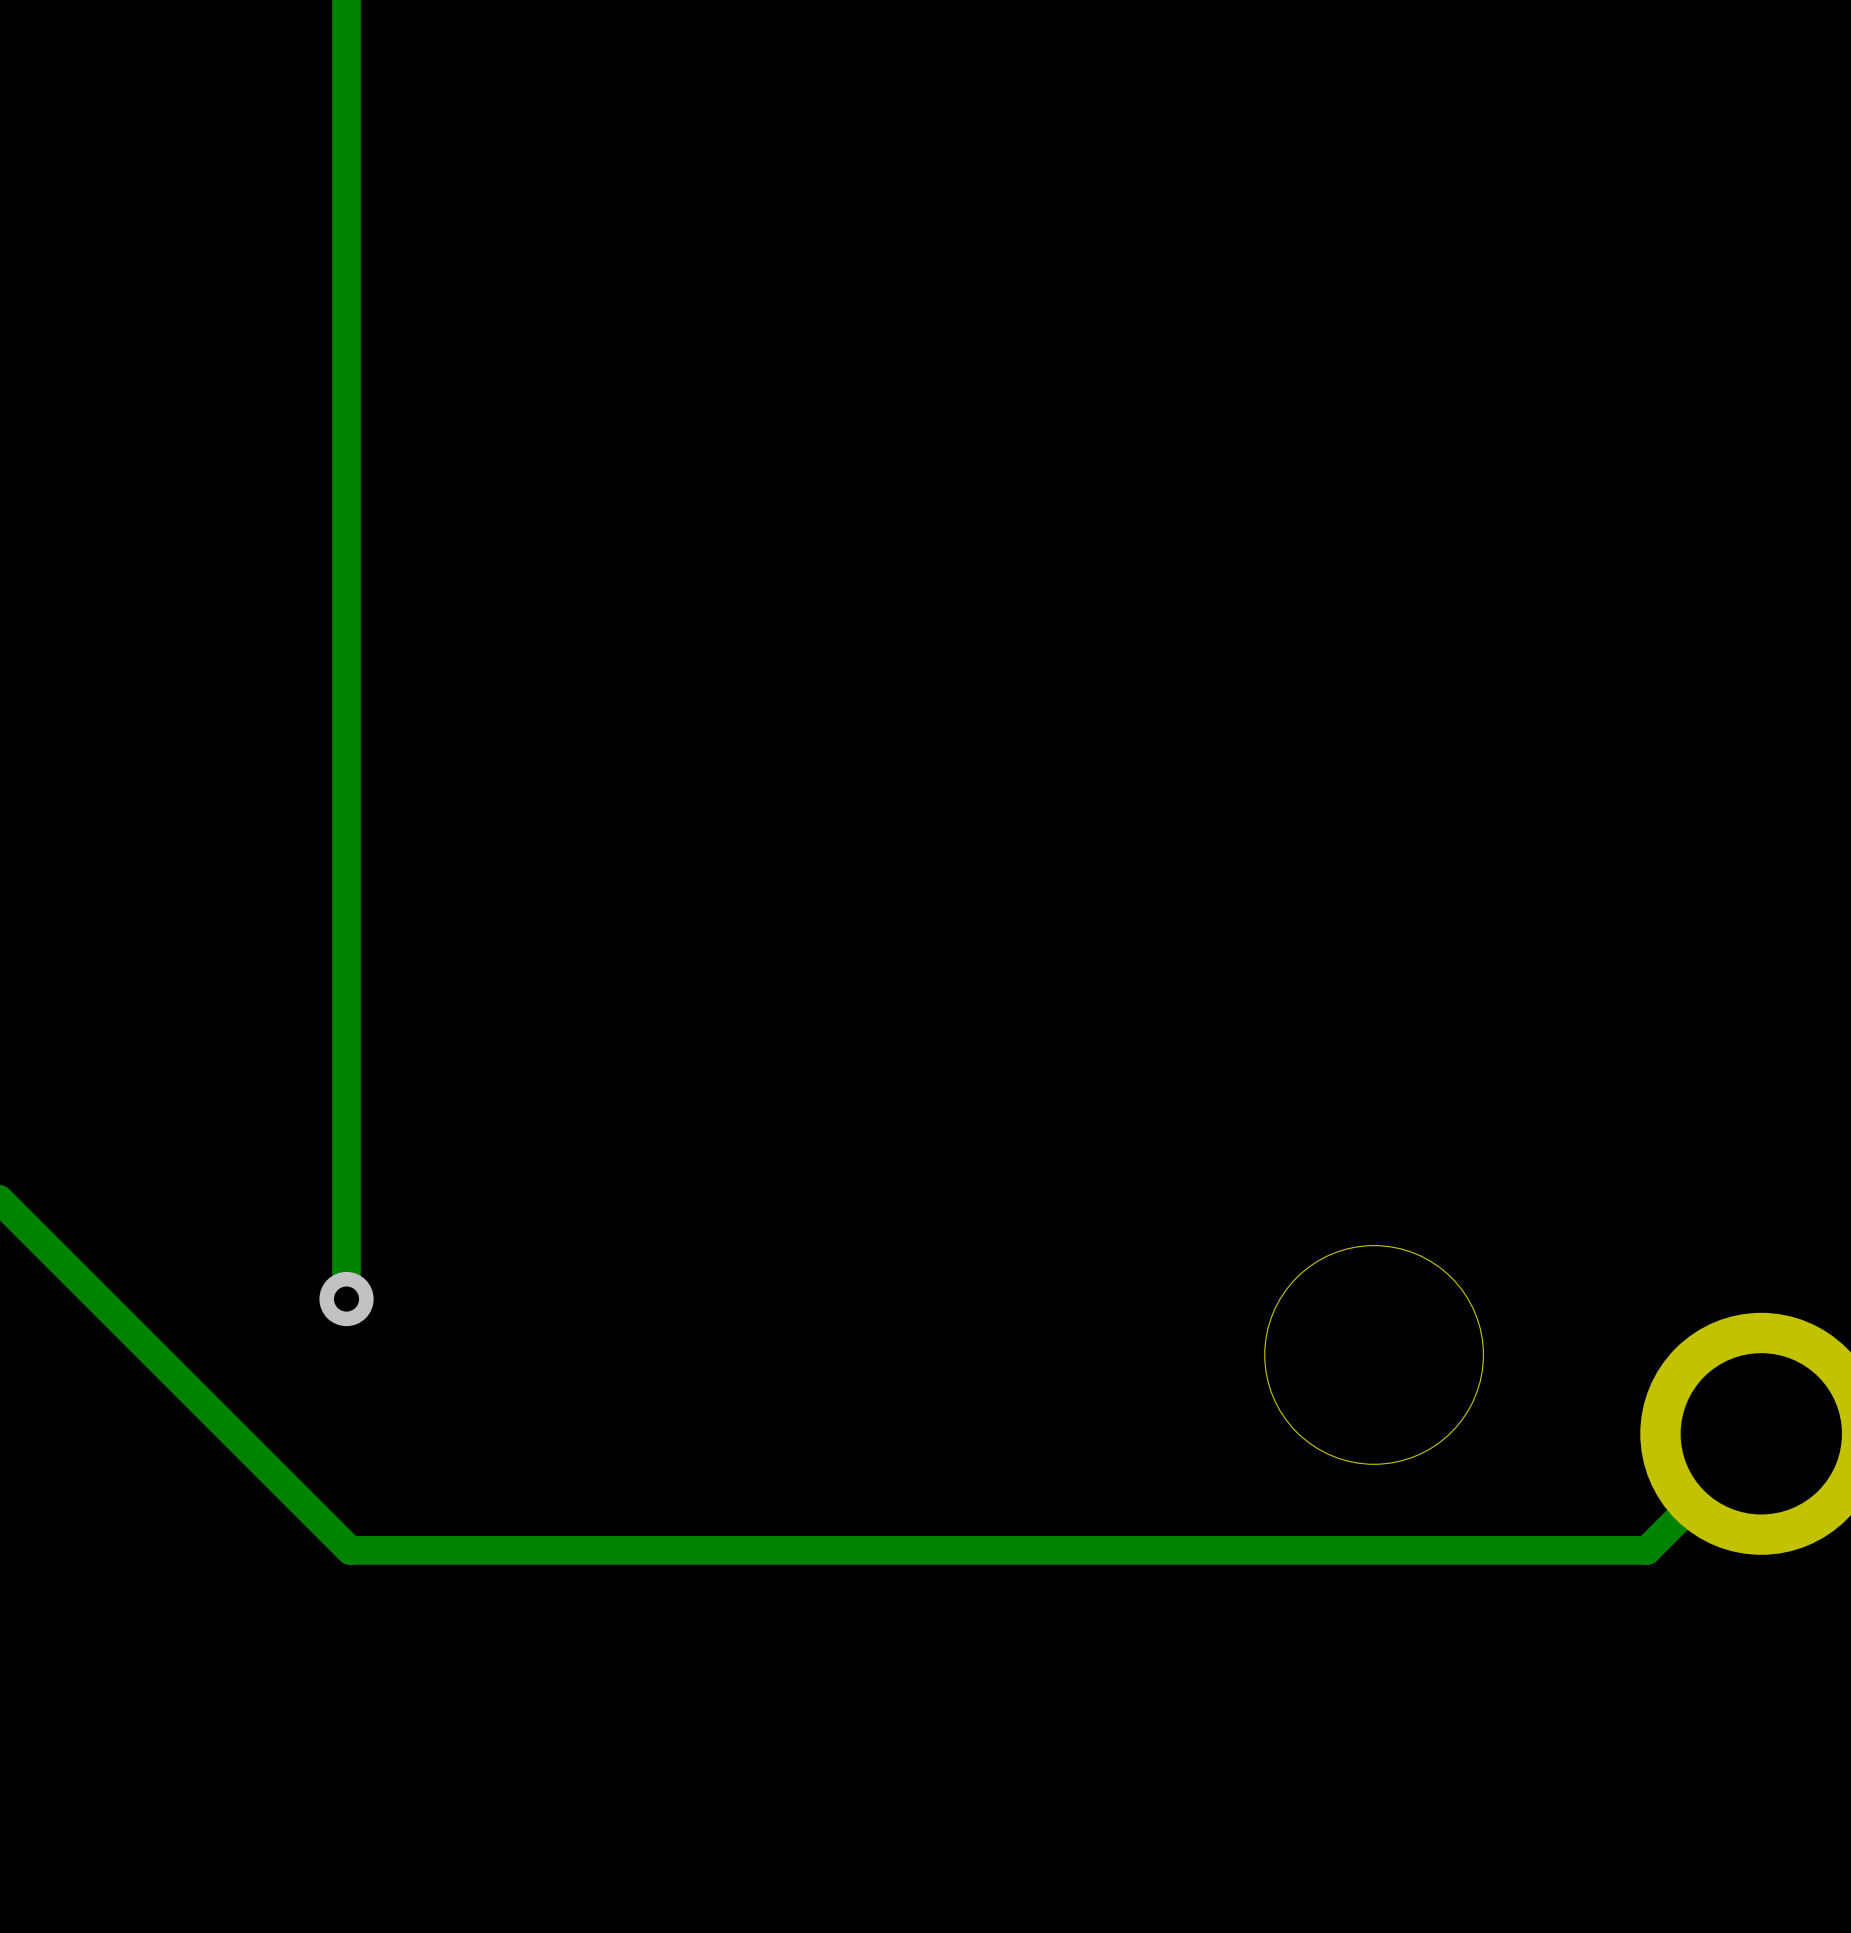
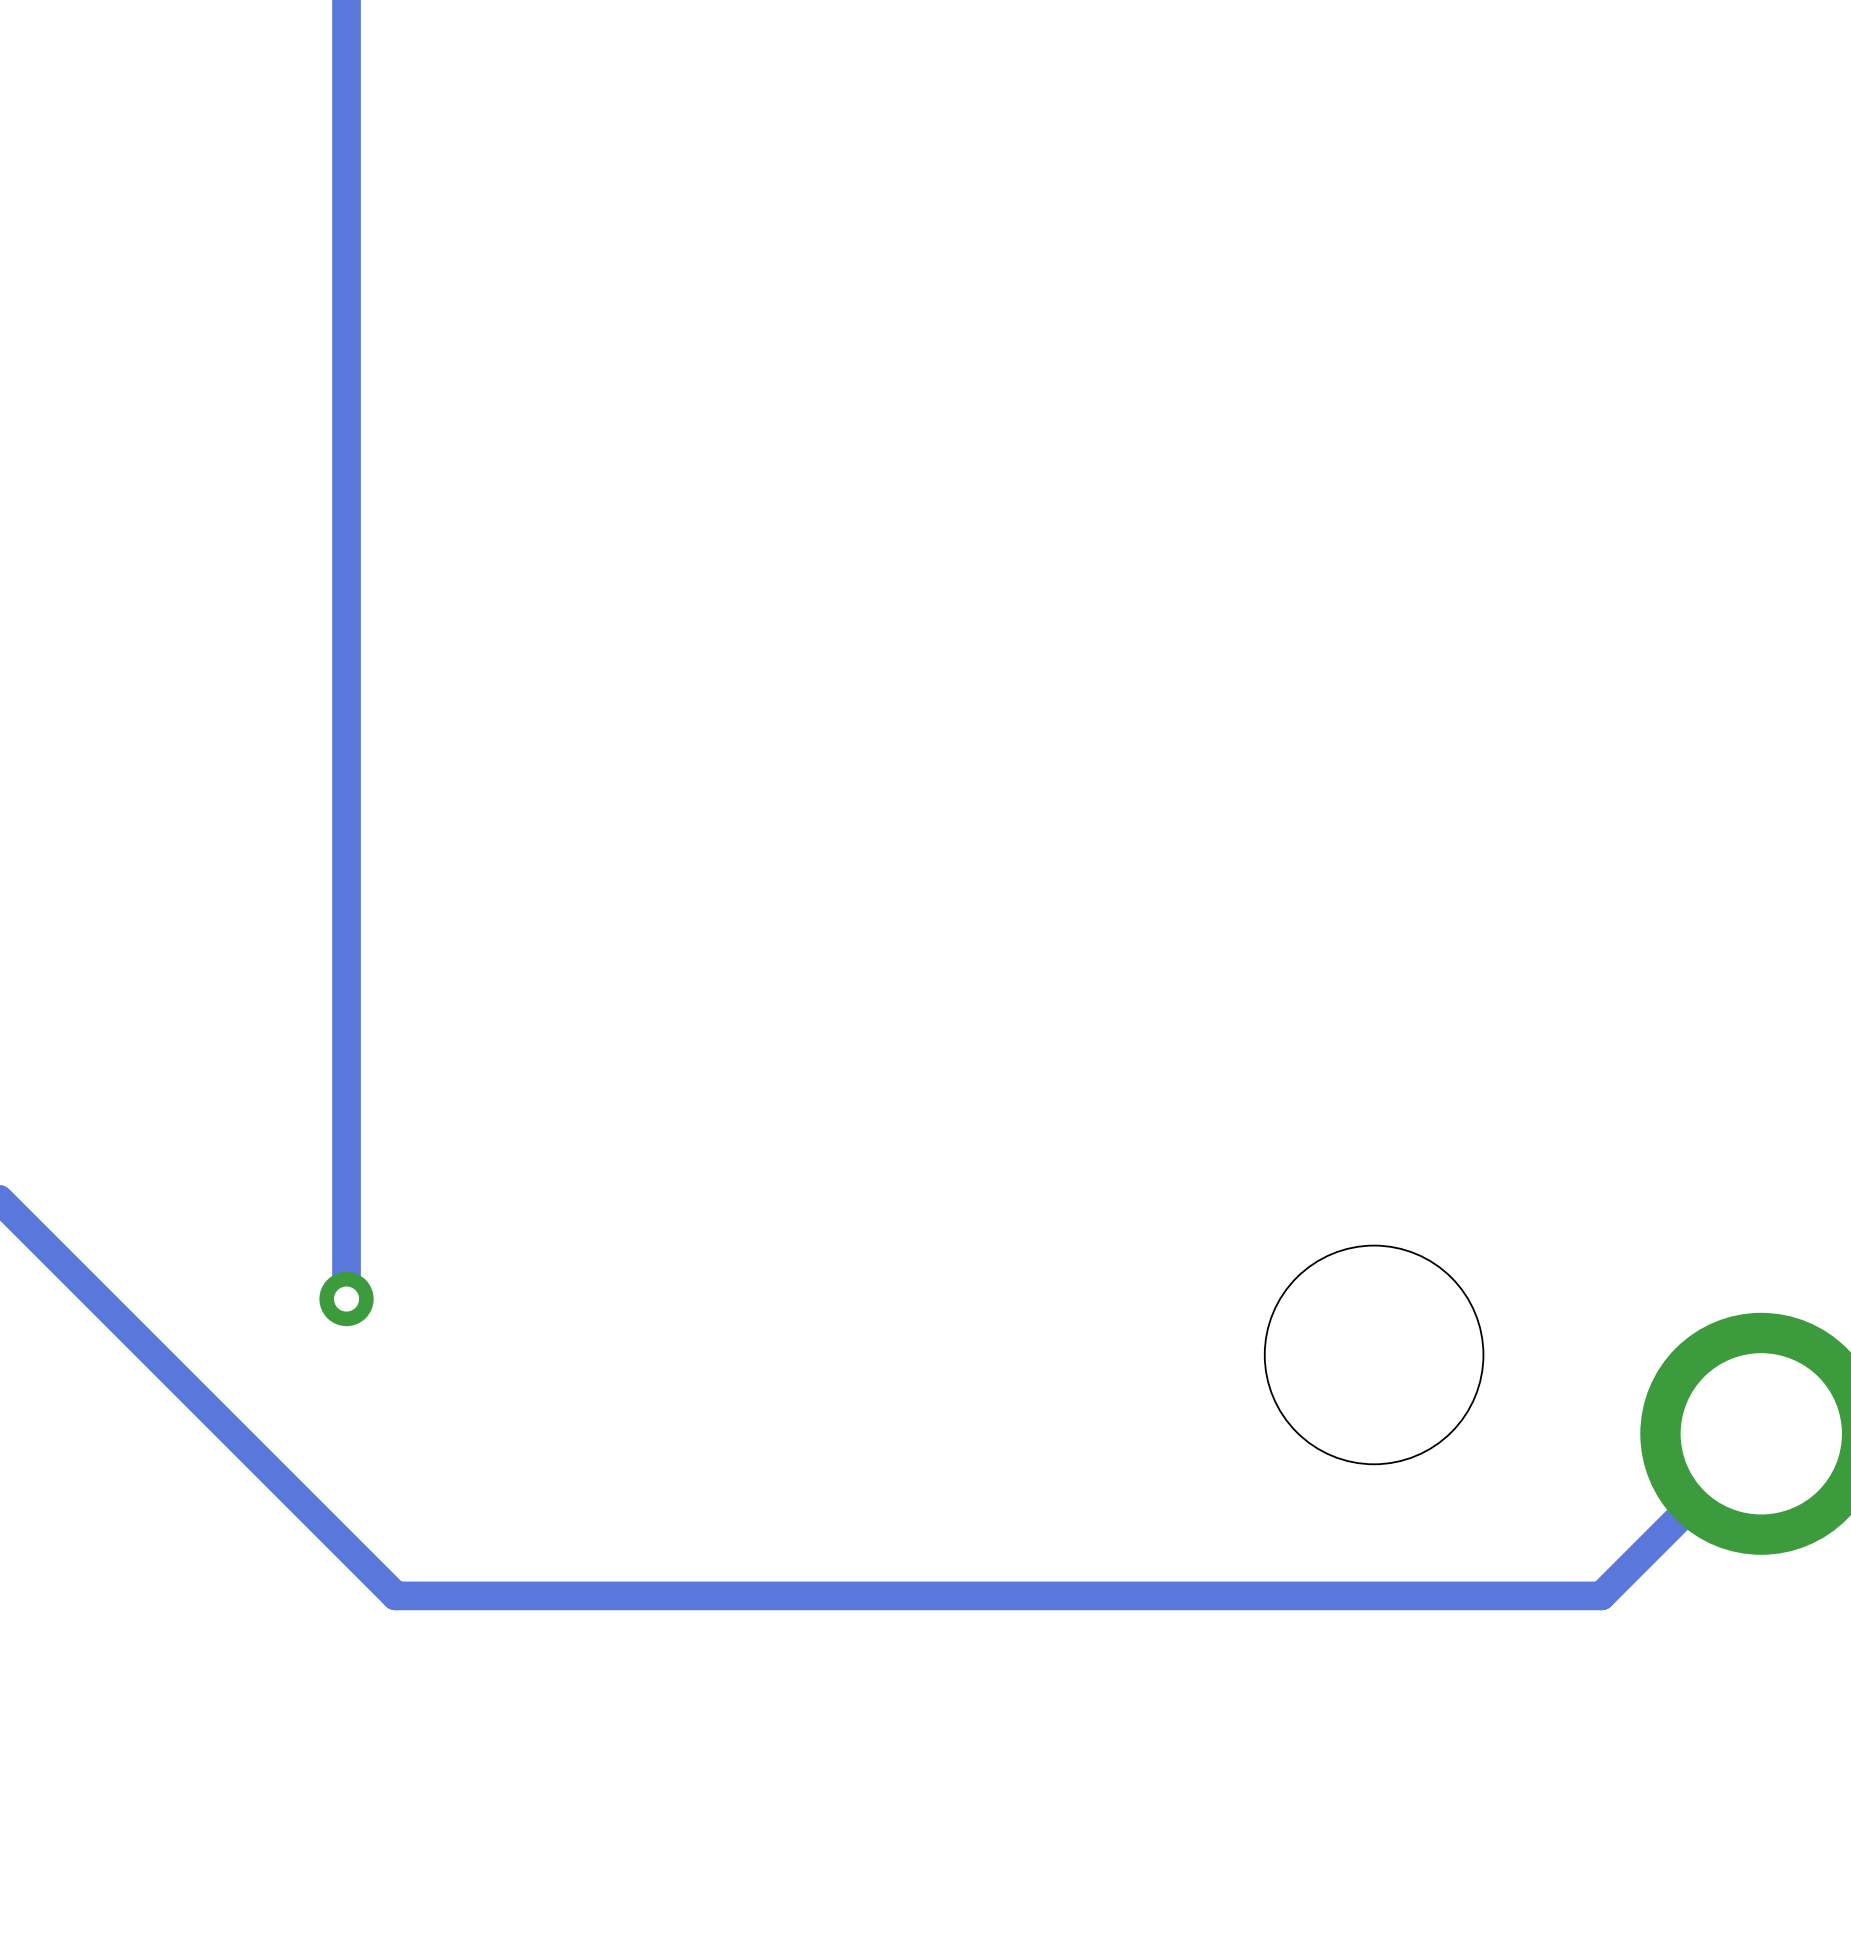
track: (1646, 1550) (350, 1550) -> (1646, 1550) (1601, 1595) (395, 1595) (350, 1550)

